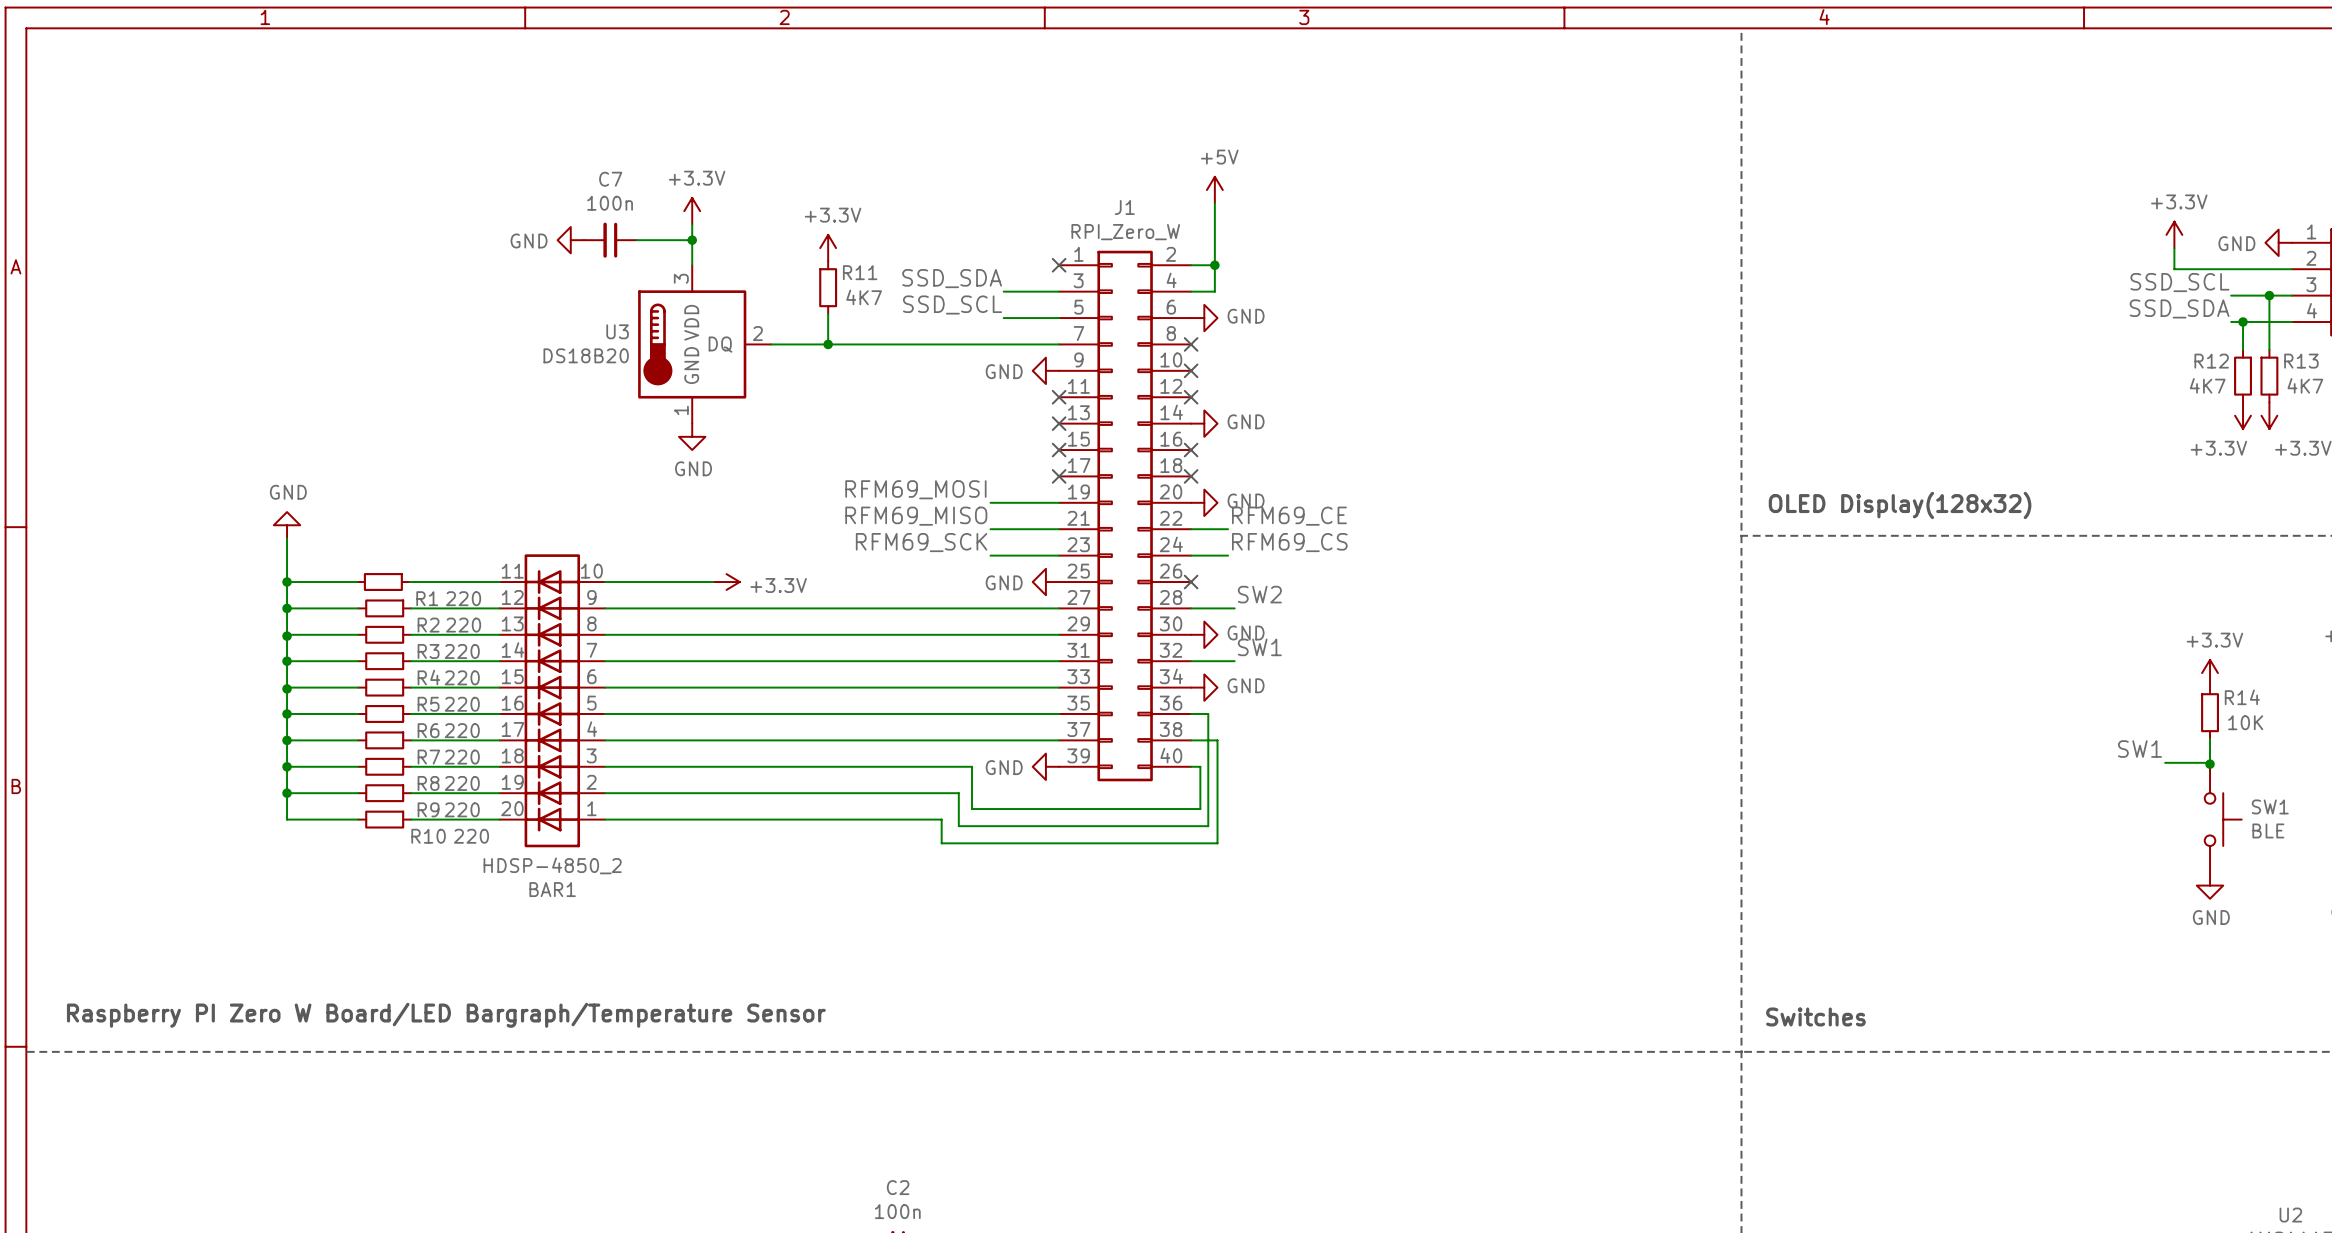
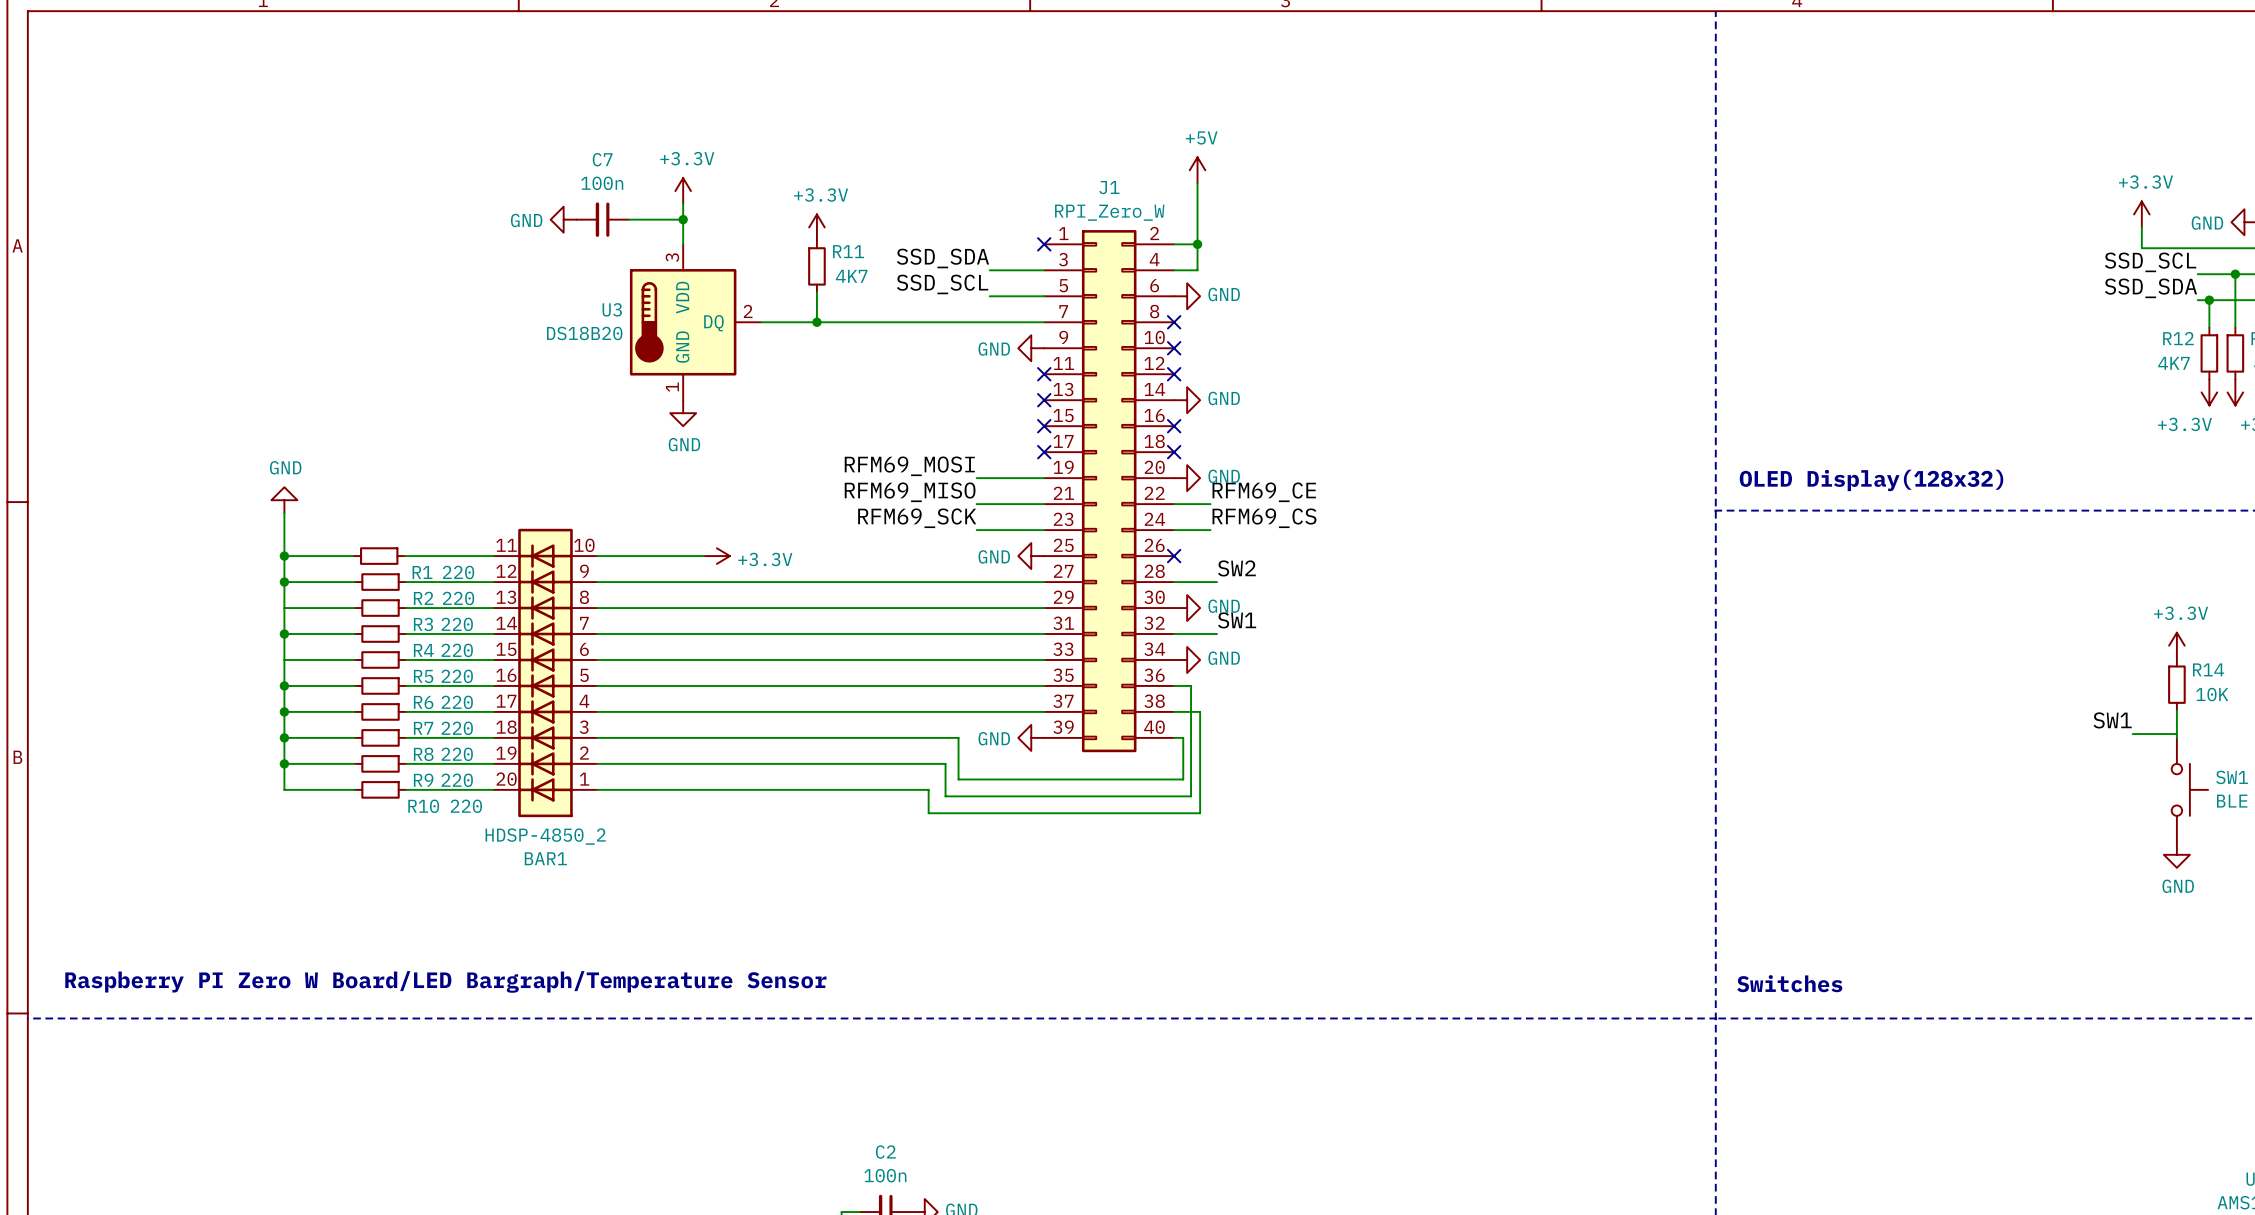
junction: (287, 636) -> none
junction: (287, 688) -> none
junction: (2210, 764) -> none

